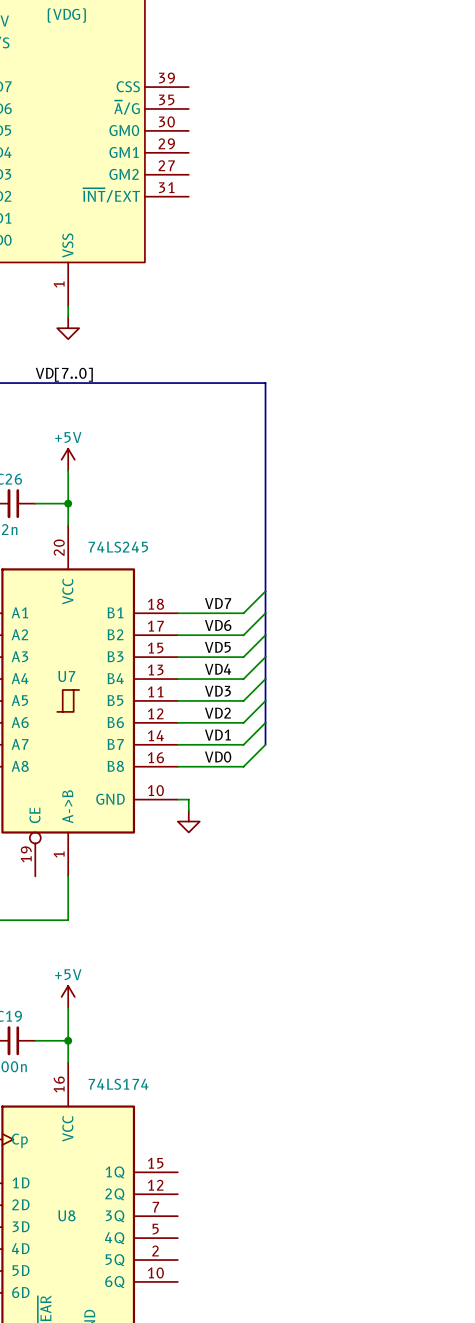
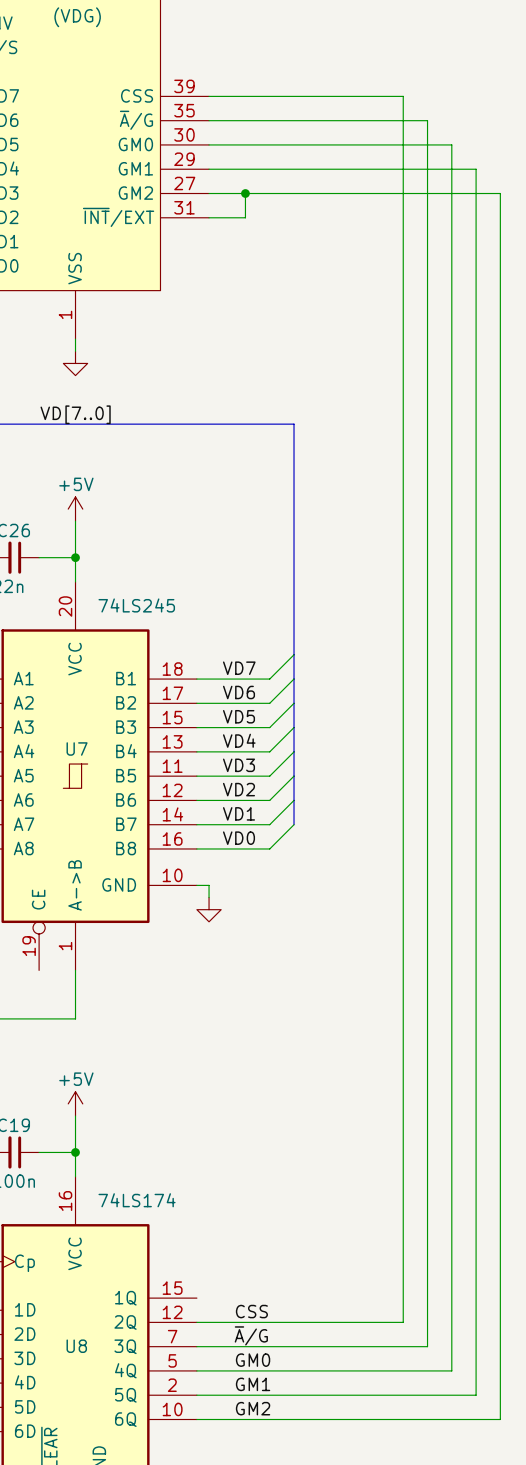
wire: none -> (209, 96) (403, 96) (403, 1322) (196, 1322)
wire: none -> (209, 120) (427, 120) (427, 1346) (196, 1346)
wire: none -> (209, 144) (451, 144) (451, 1370) (196, 1370)
wire: none -> (209, 169) (476, 169) (476, 1395) (196, 1395)
wire: none -> (209, 193) (500, 193) (500, 1419) (196, 1419)
wire: none -> (245, 193) (245, 217) (209, 217)
junction: none -> (245, 193)
label: none -> CSS (251, 1311)
label: none -> ~{A}/G (251, 1335)
label: none -> GM0 (253, 1360)
label: none -> GM1 (253, 1384)
label: none -> GM2 (253, 1408)

